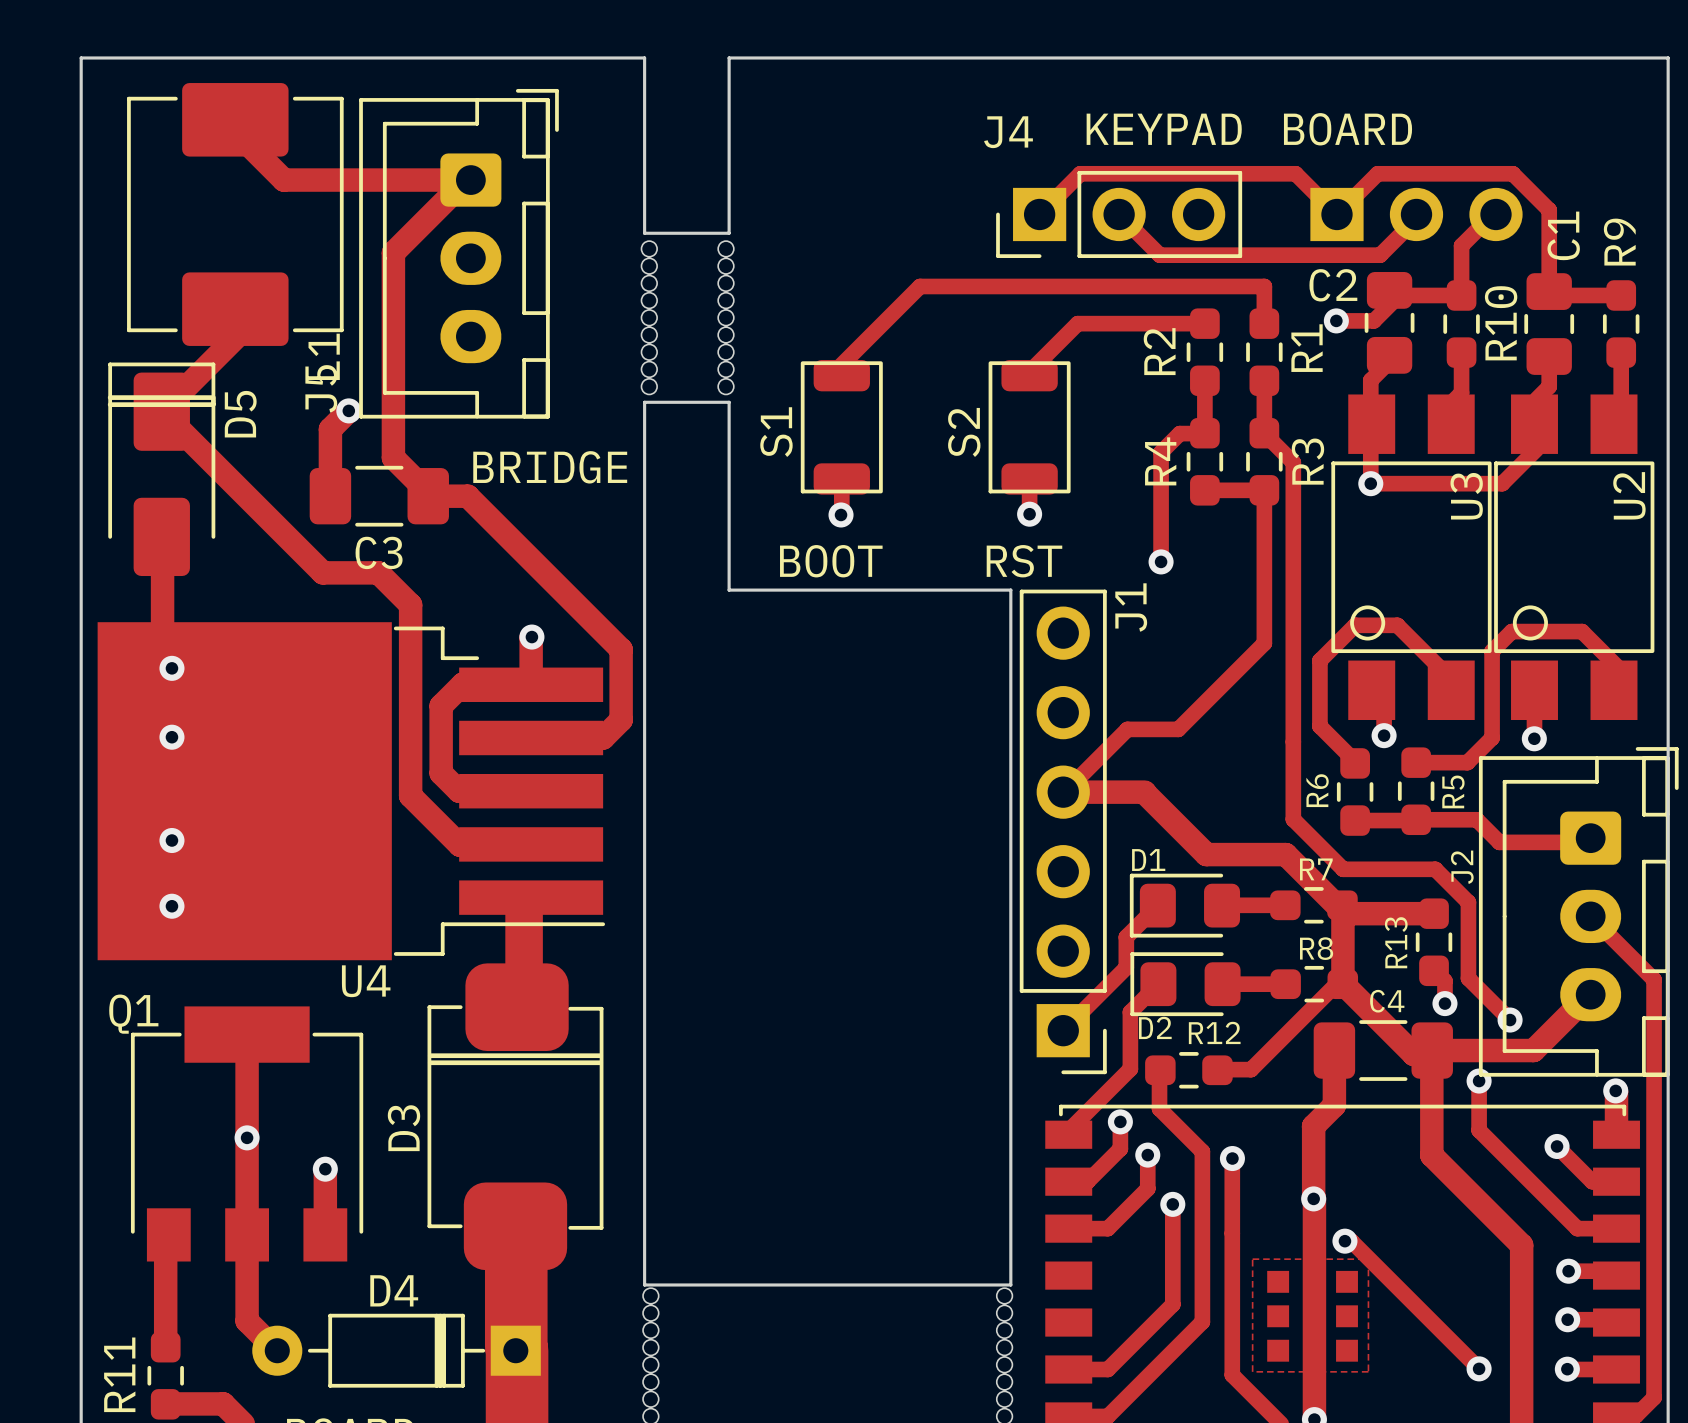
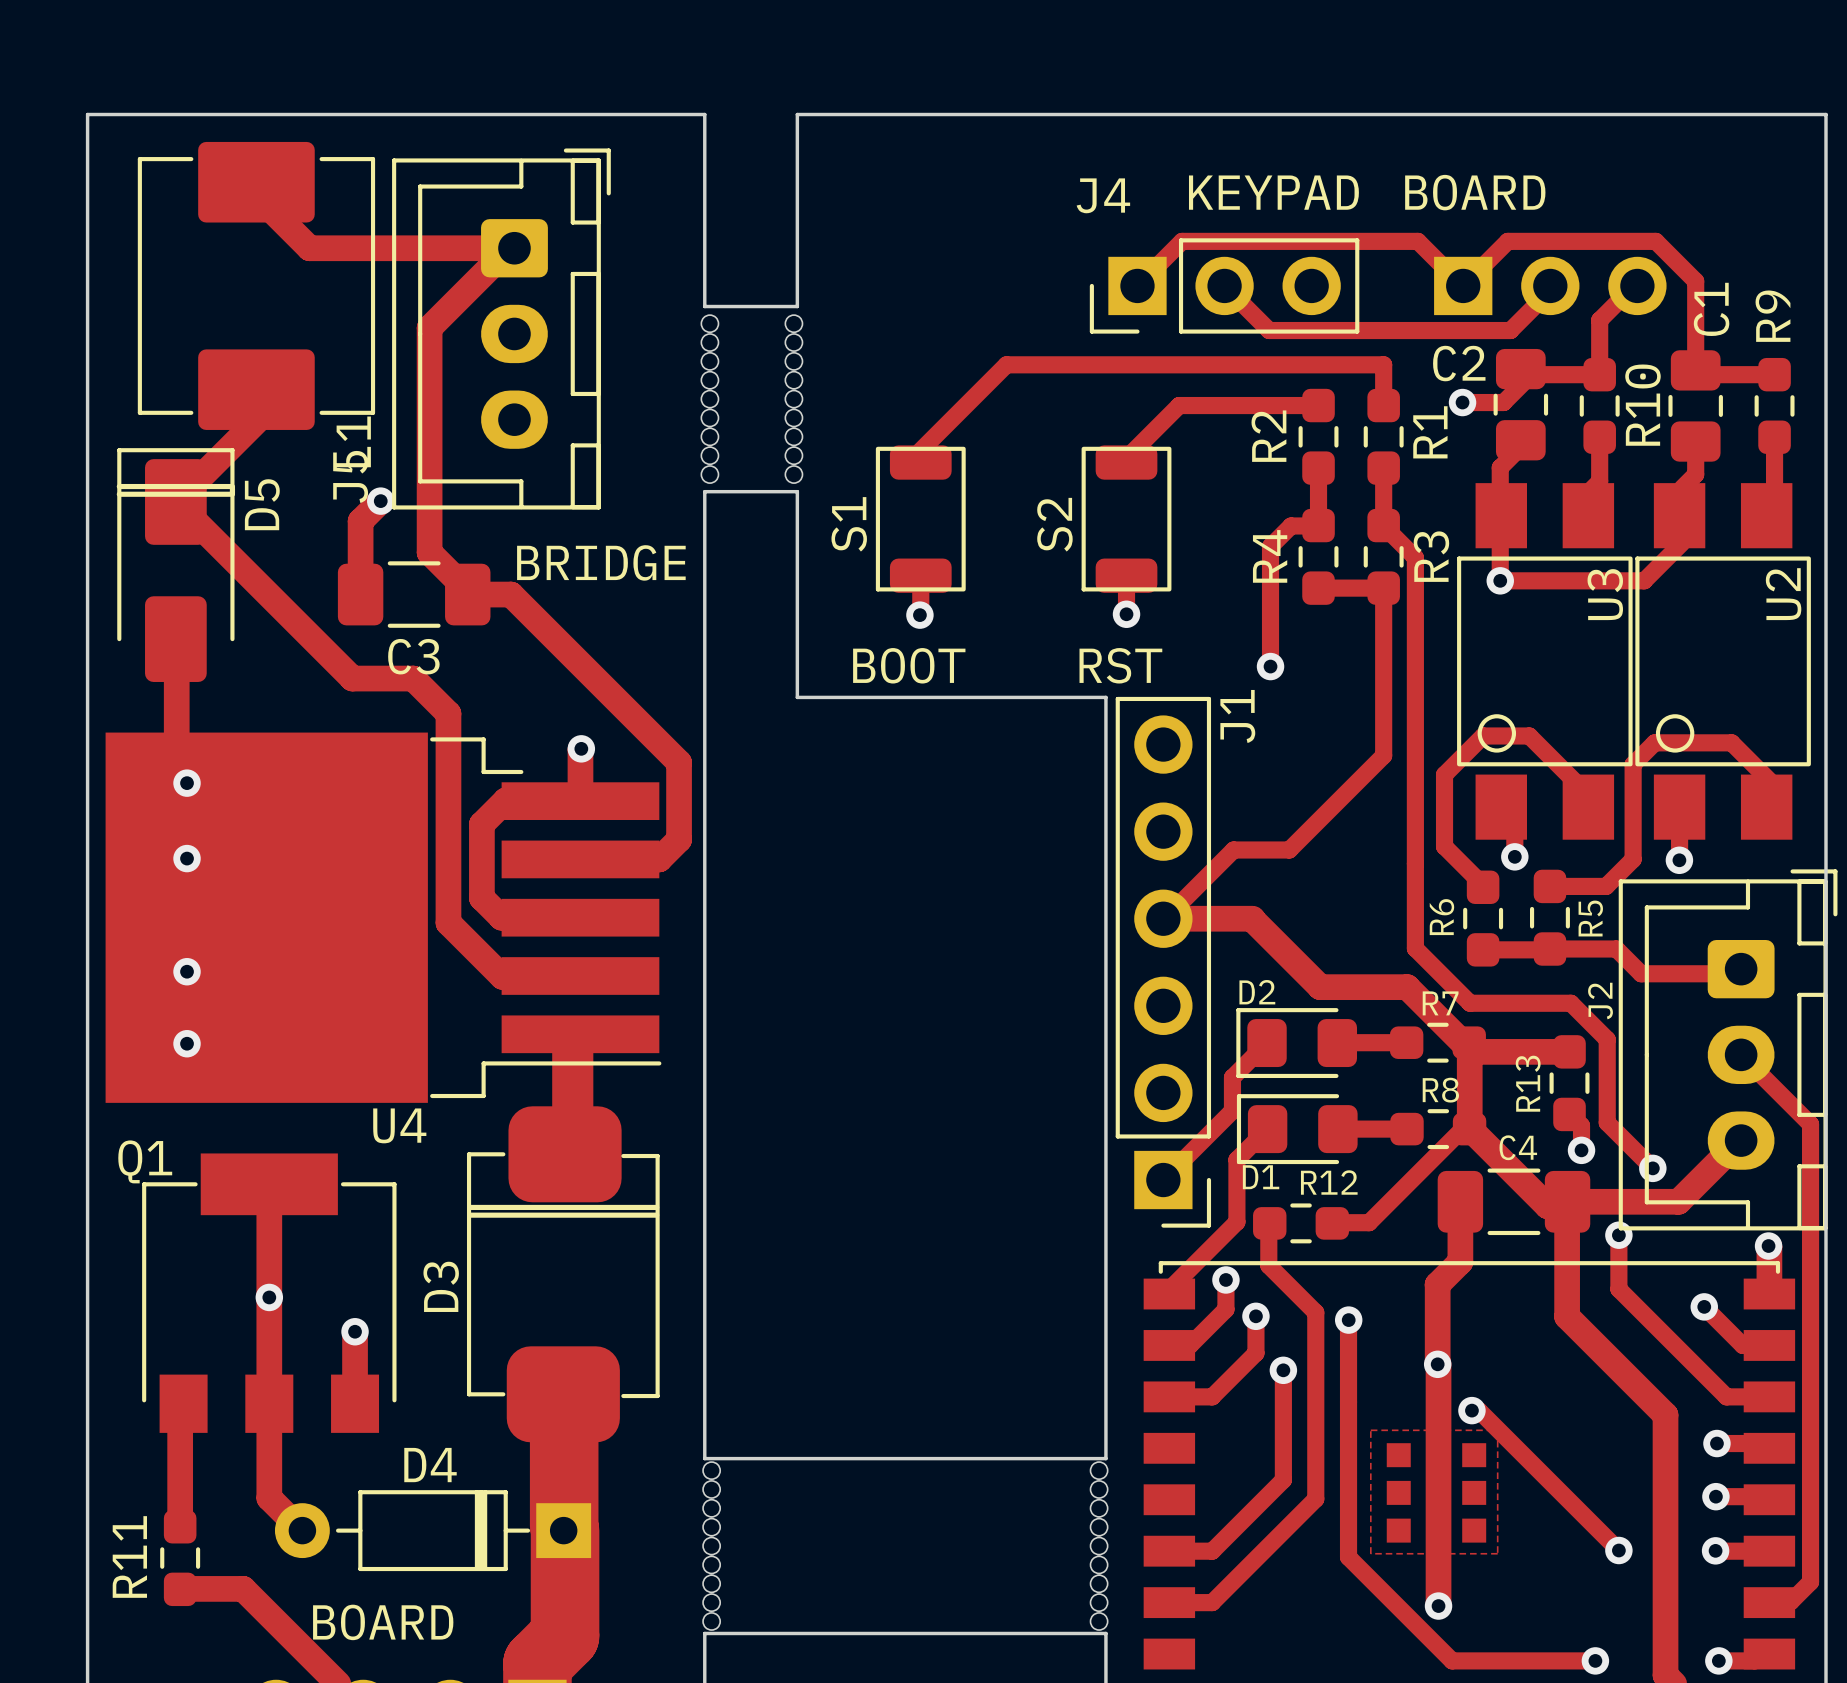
D1 name position: D1 (1148, 860) -> D1 (1261, 1177)
D2 name position: D2 (1155, 1027) -> D2 (1257, 992)

